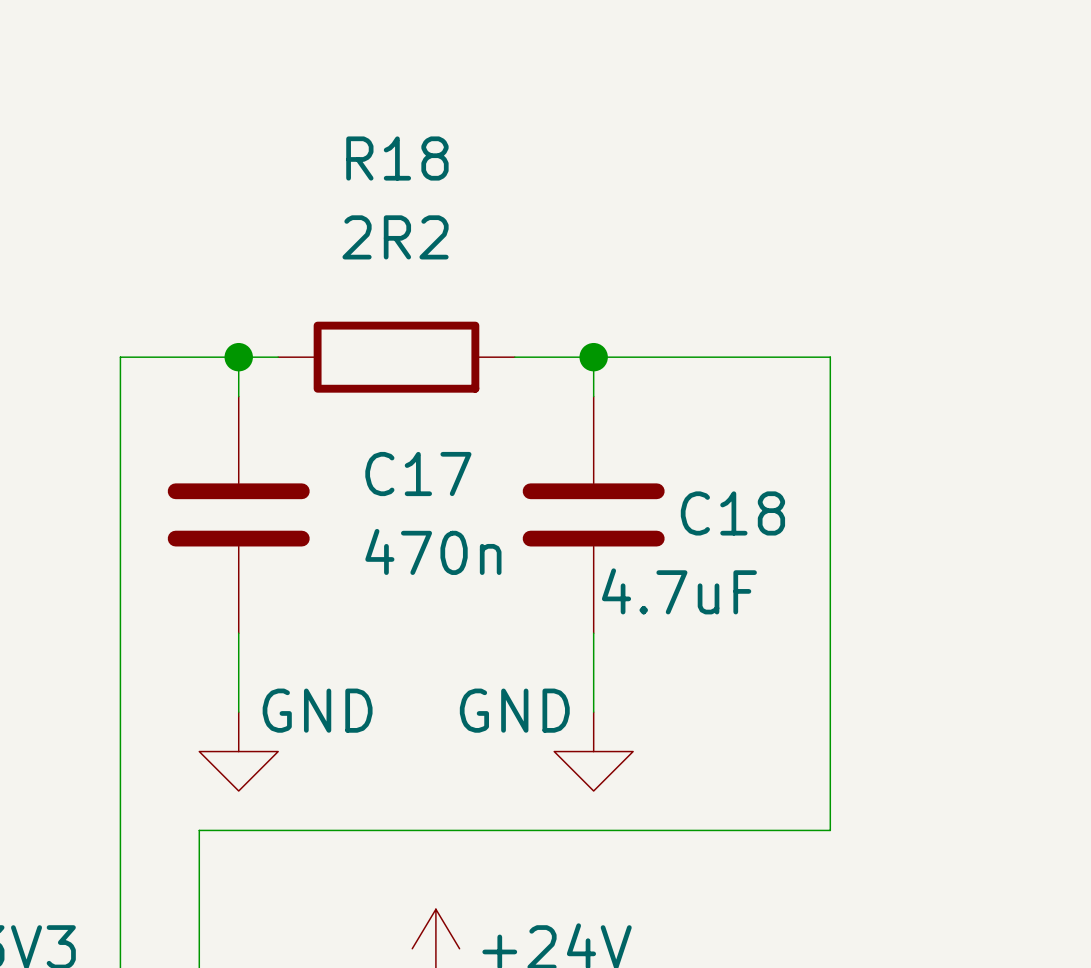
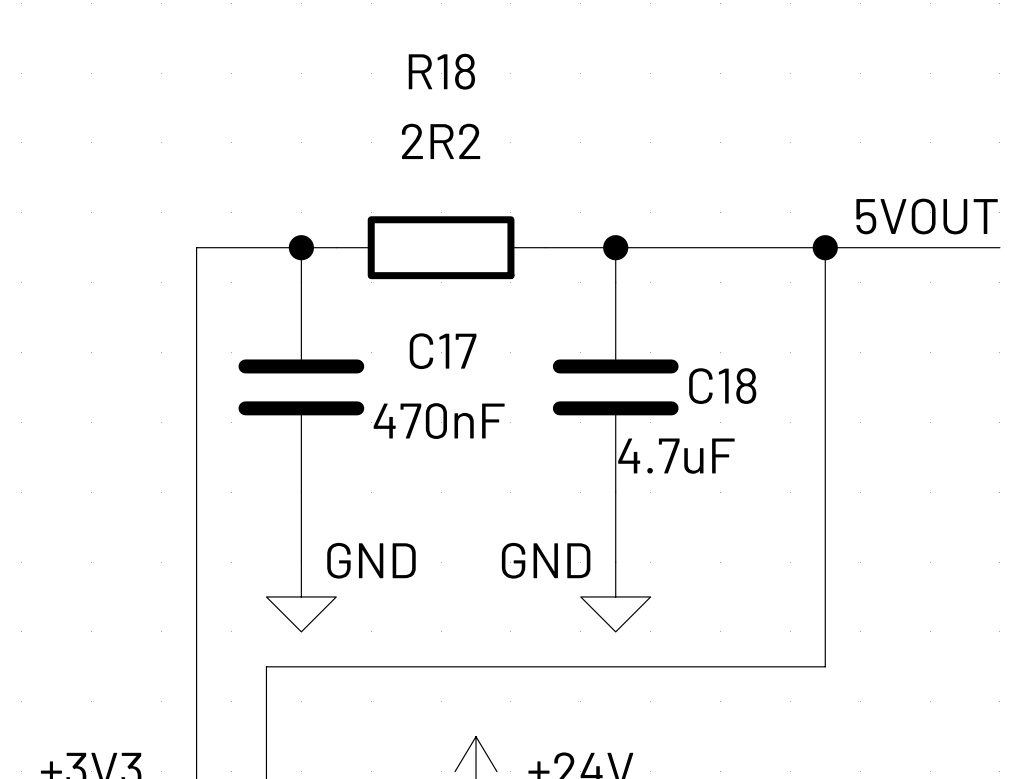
label: none -> 5VOUT (927, 216)
wire: none -> (825, 247) (999, 247)
junction: none -> (825, 247)
C17 value: 470n (433, 551) -> 470nF (439, 421)

